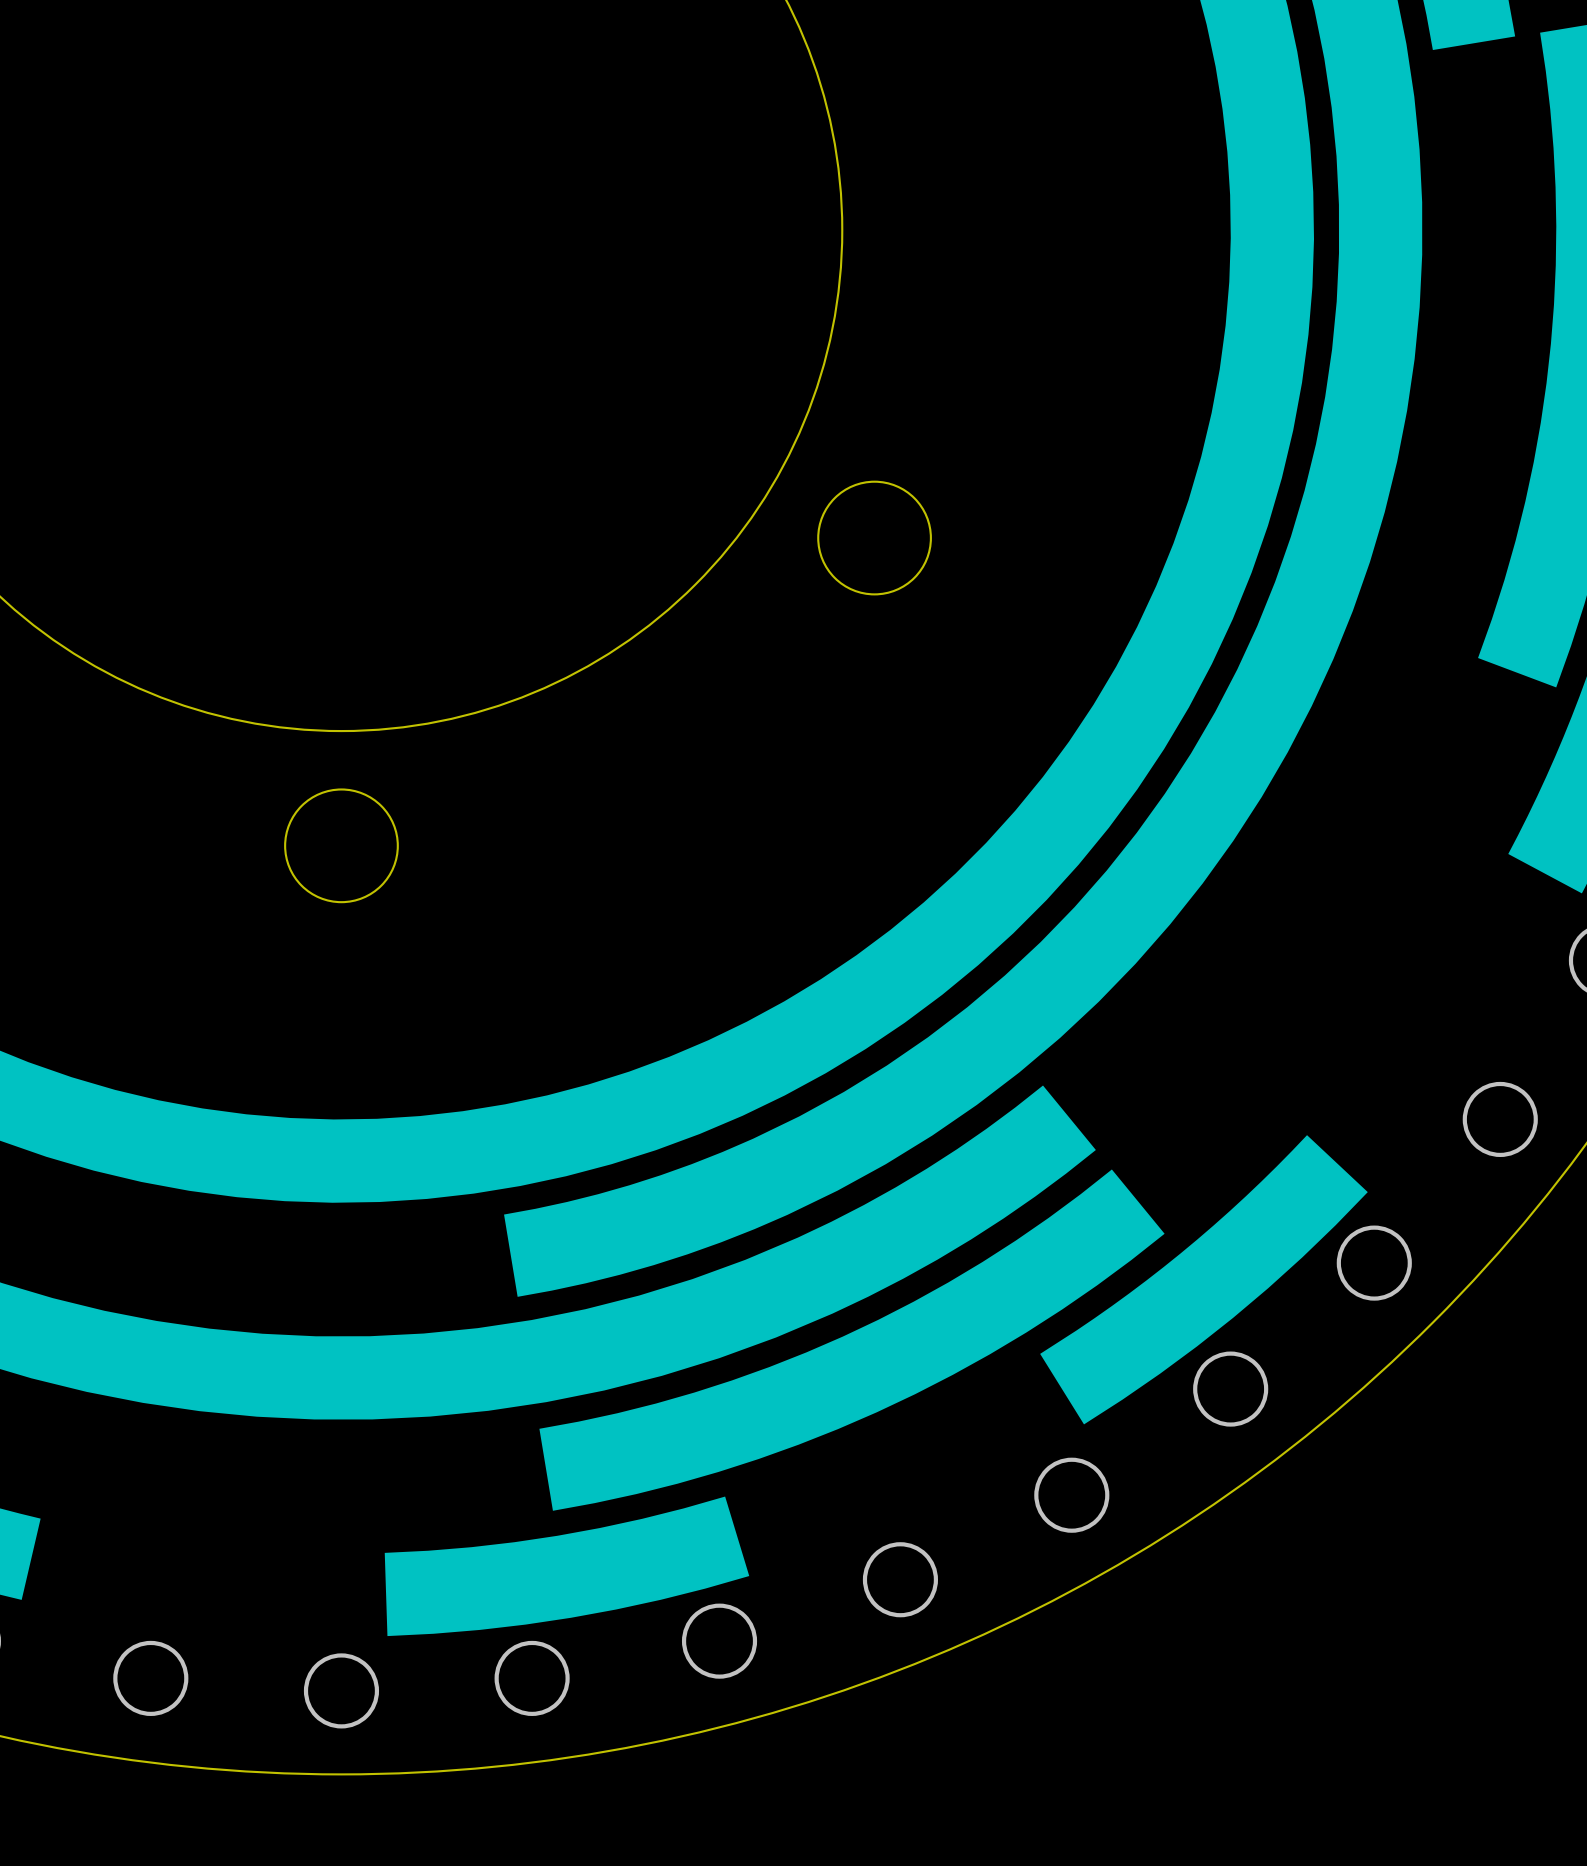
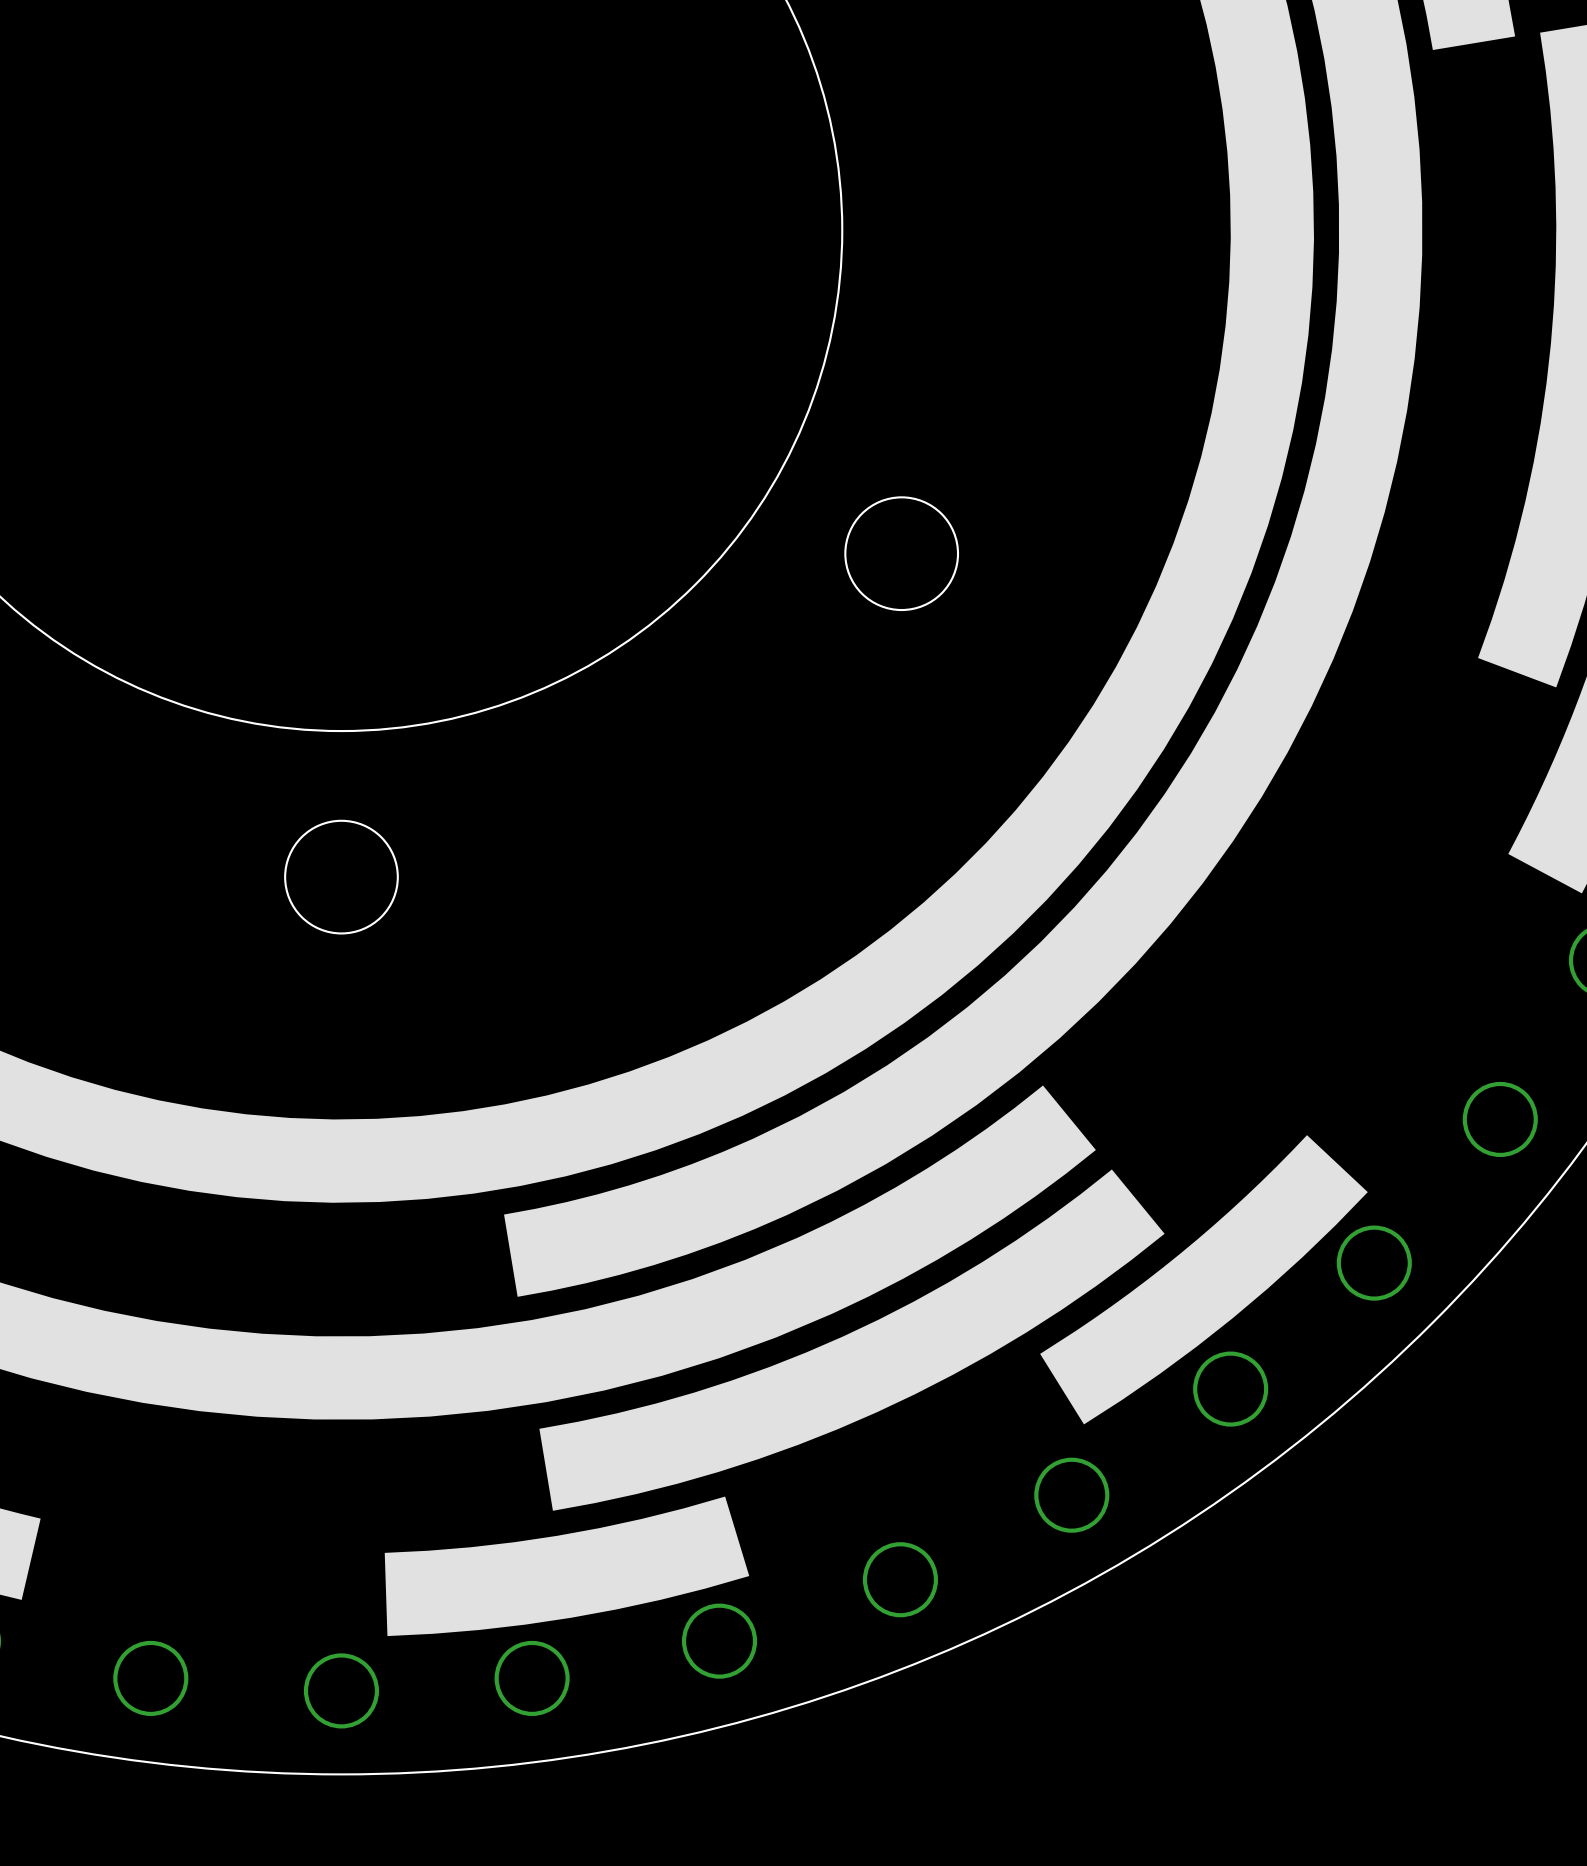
round board edge position: (874, 538) -> (901, 553)
round board edge position: (341, 845) -> (341, 877)

